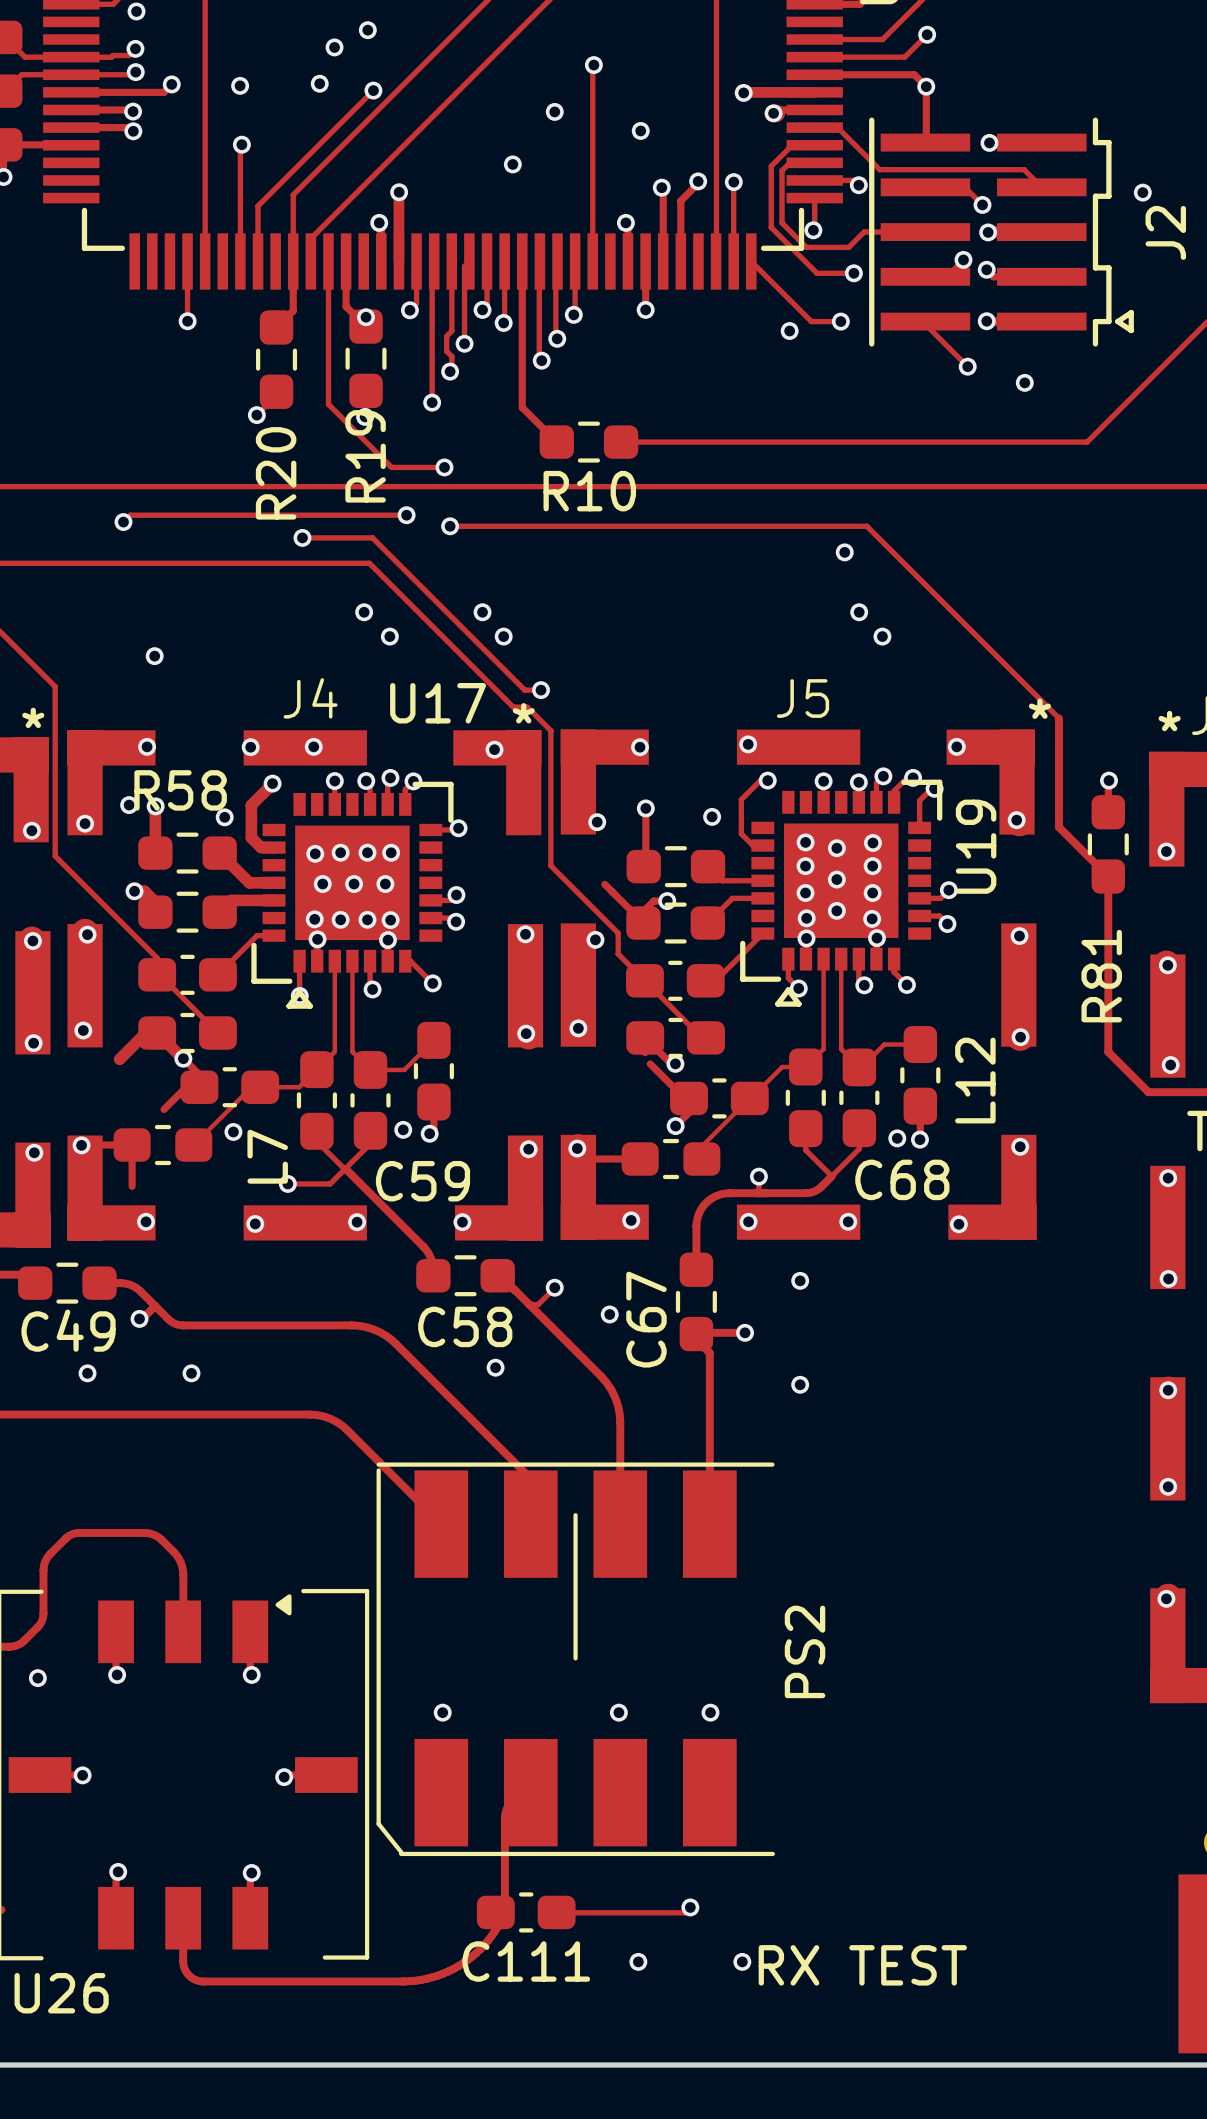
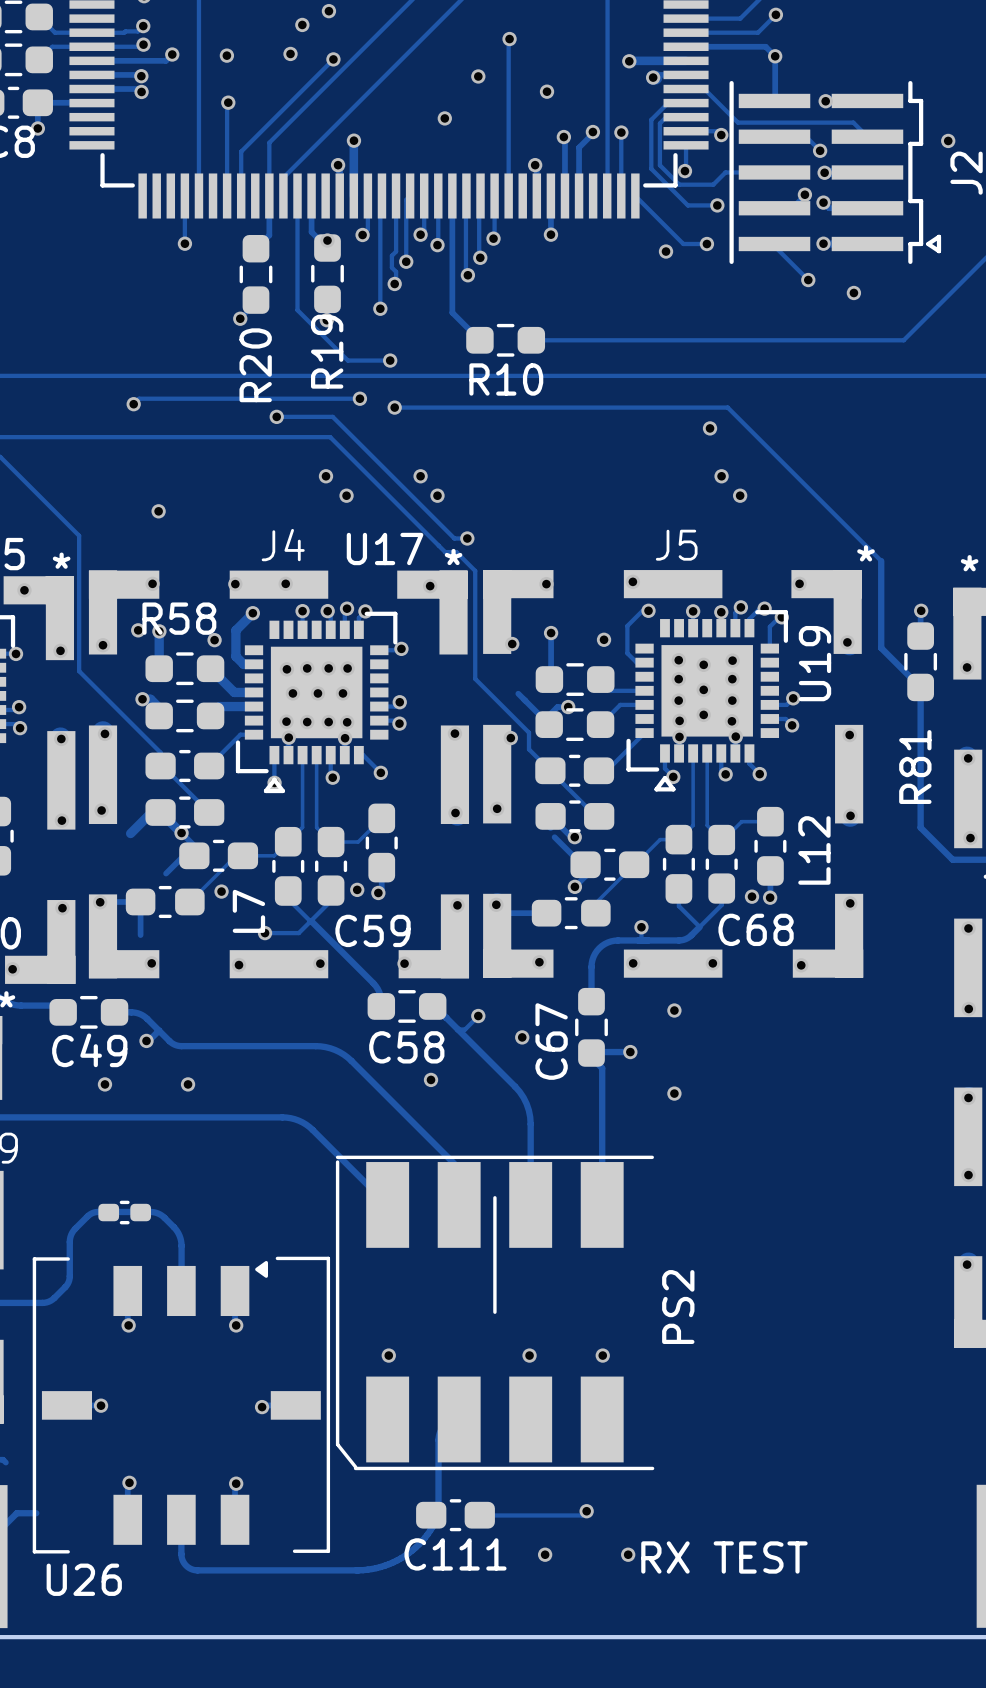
part: none -> (124, 1212)
via: (37, 1678) -> none

